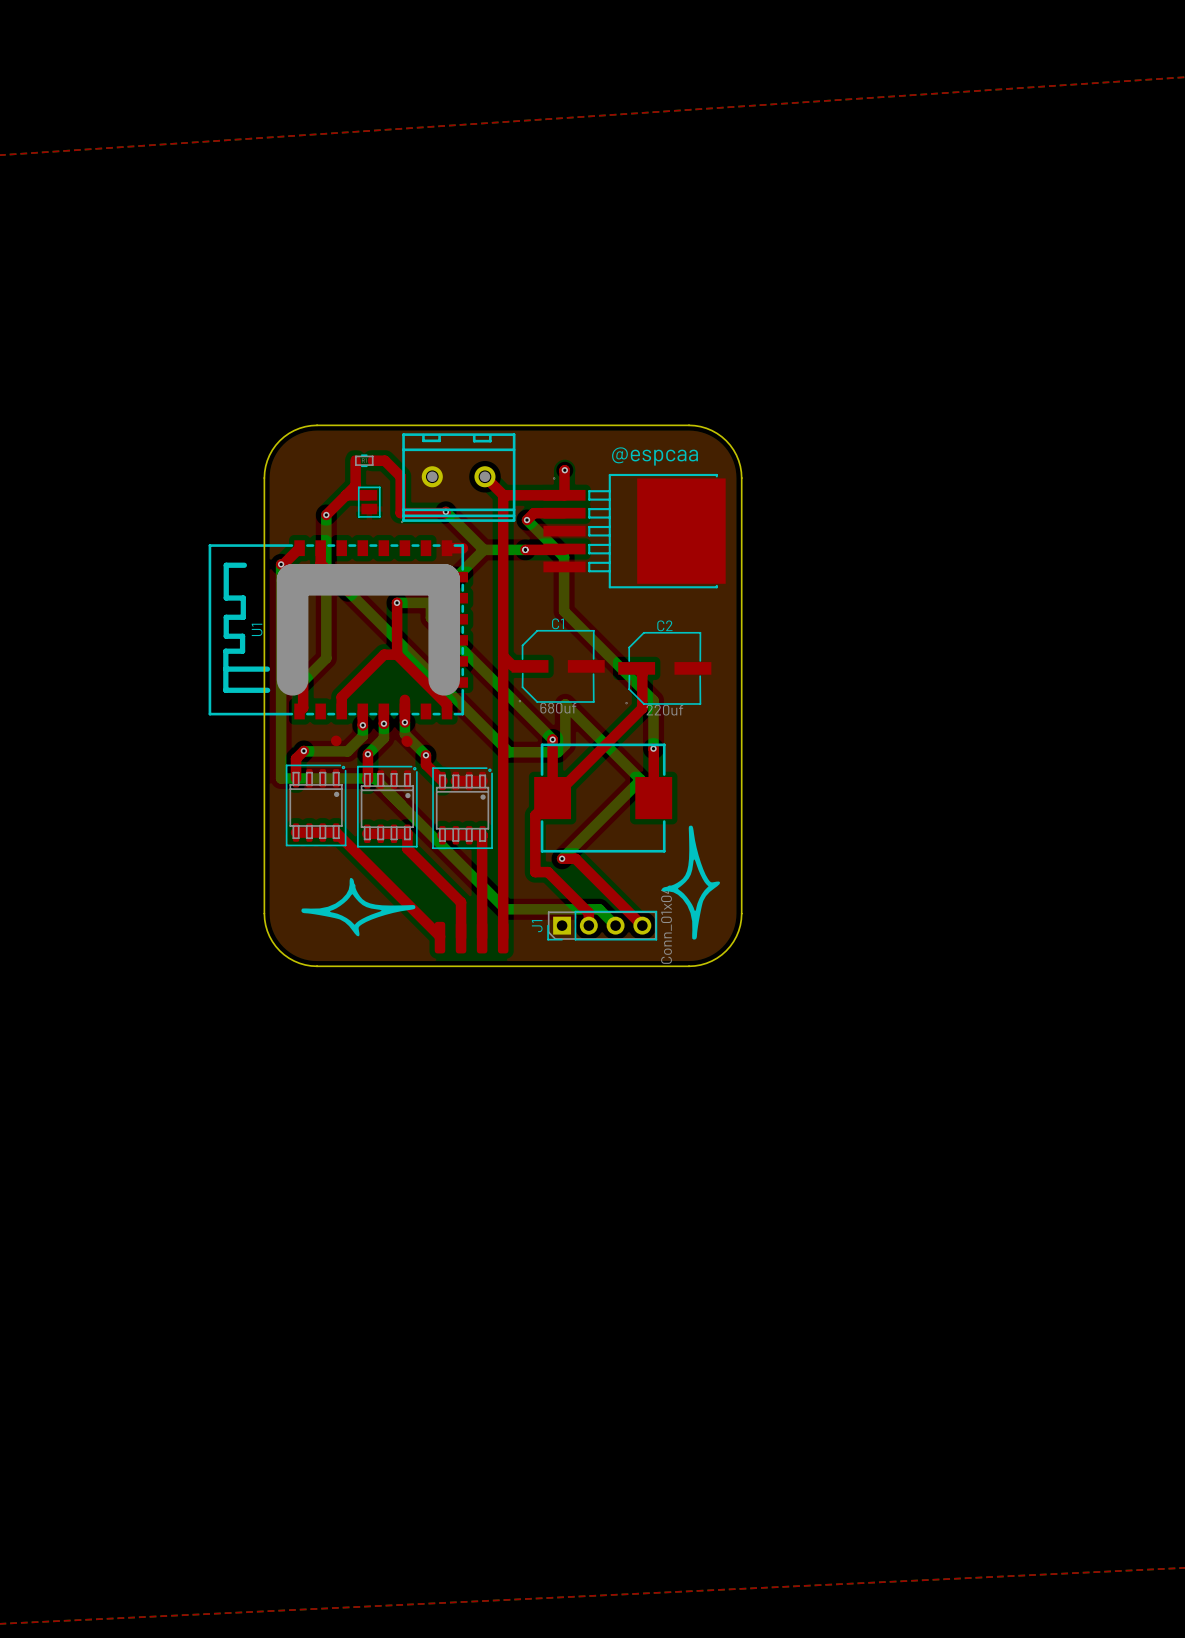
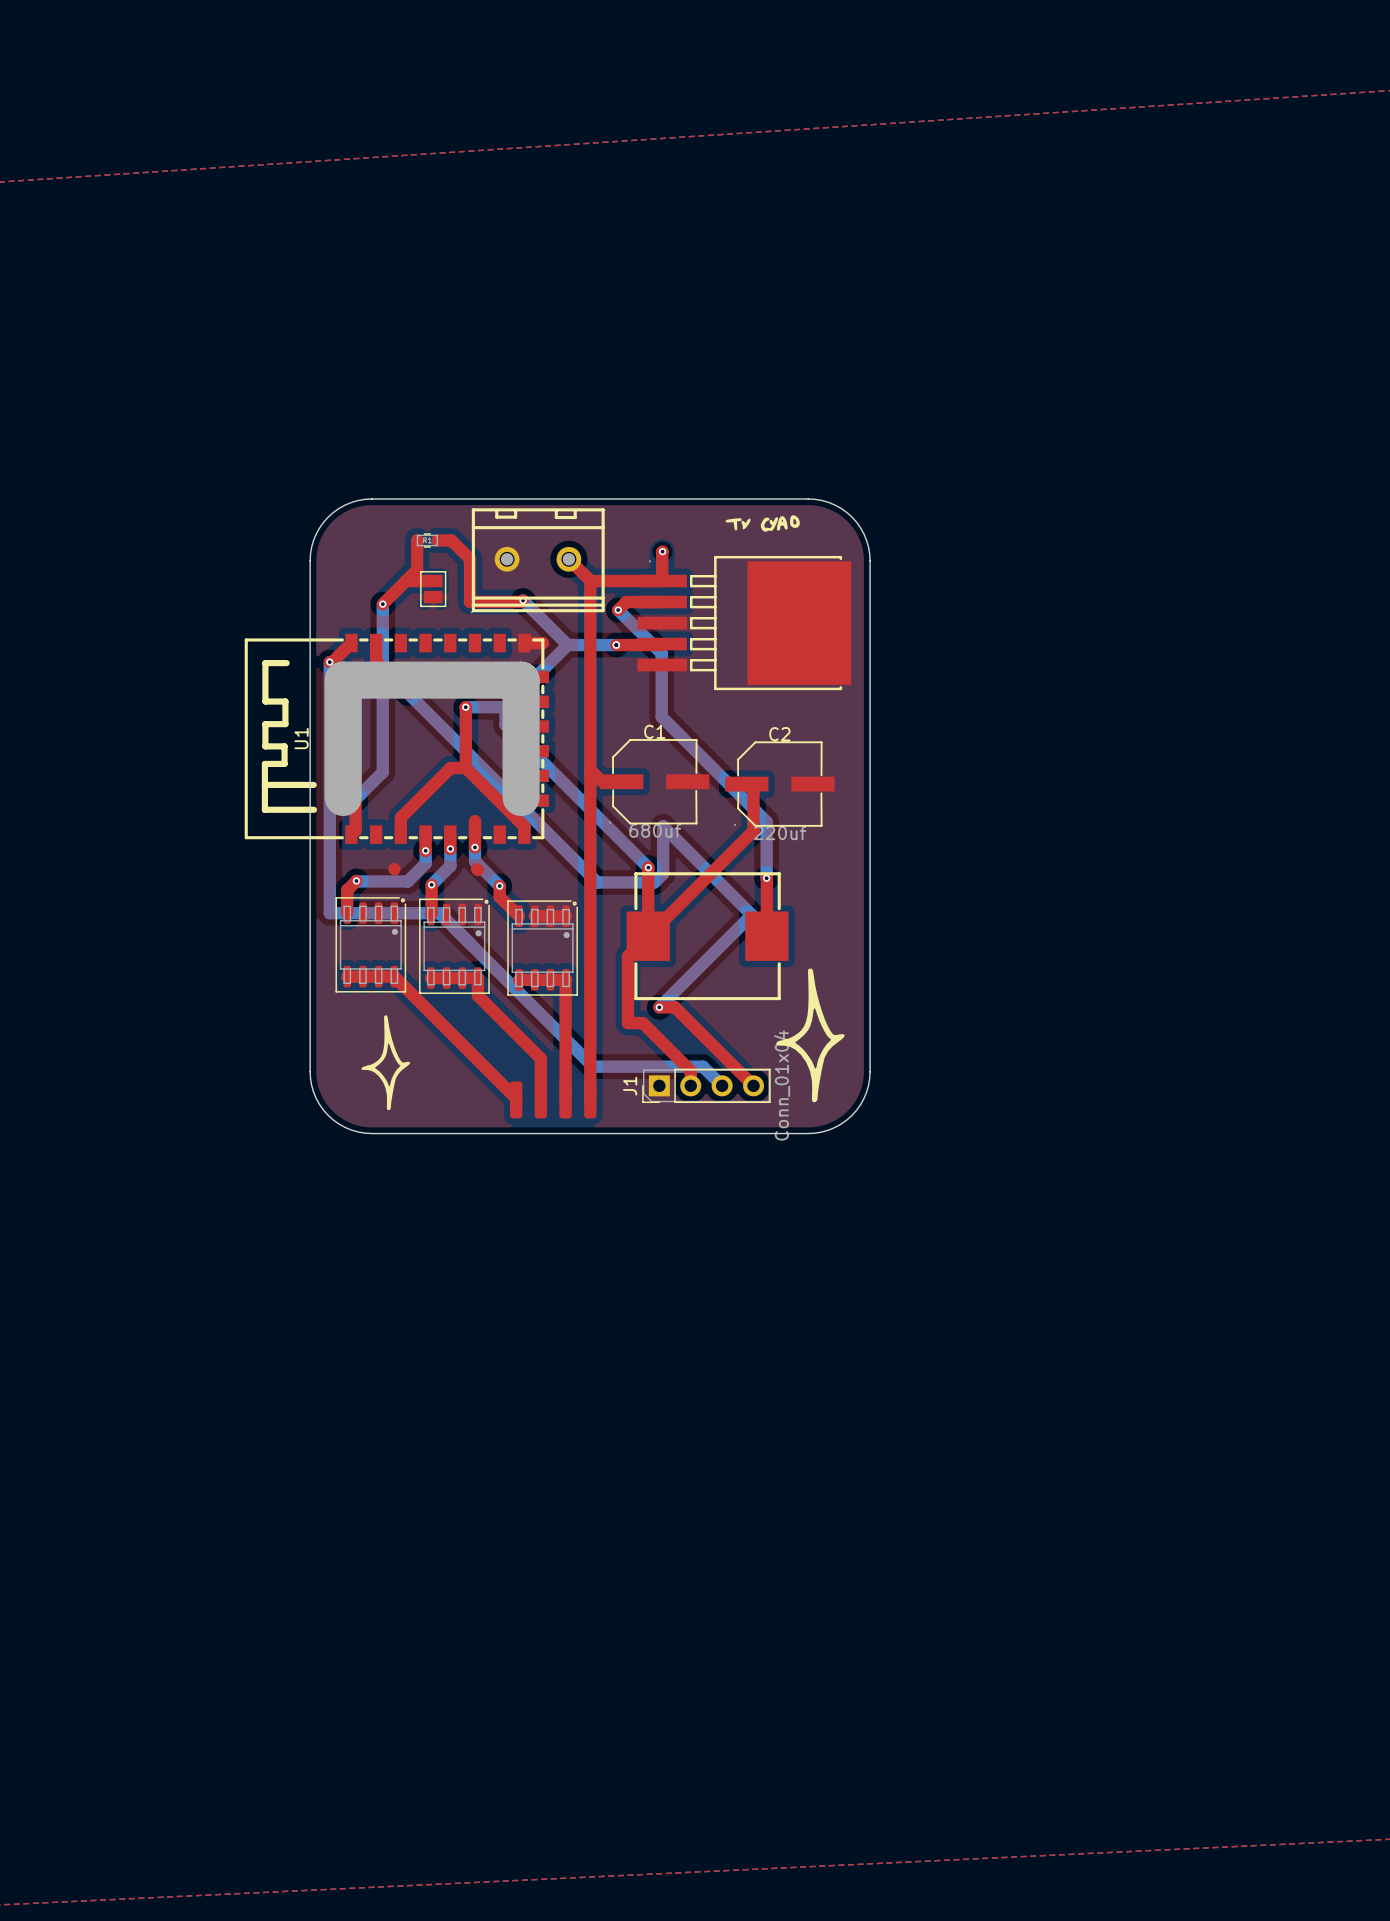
drawing: none -> [725, 515, 800, 532]
text: @espcaa (655, 456) -> none
drawing: none -> [361, 1015, 411, 1111]
drawing: [301, 878, 416, 937] -> none

